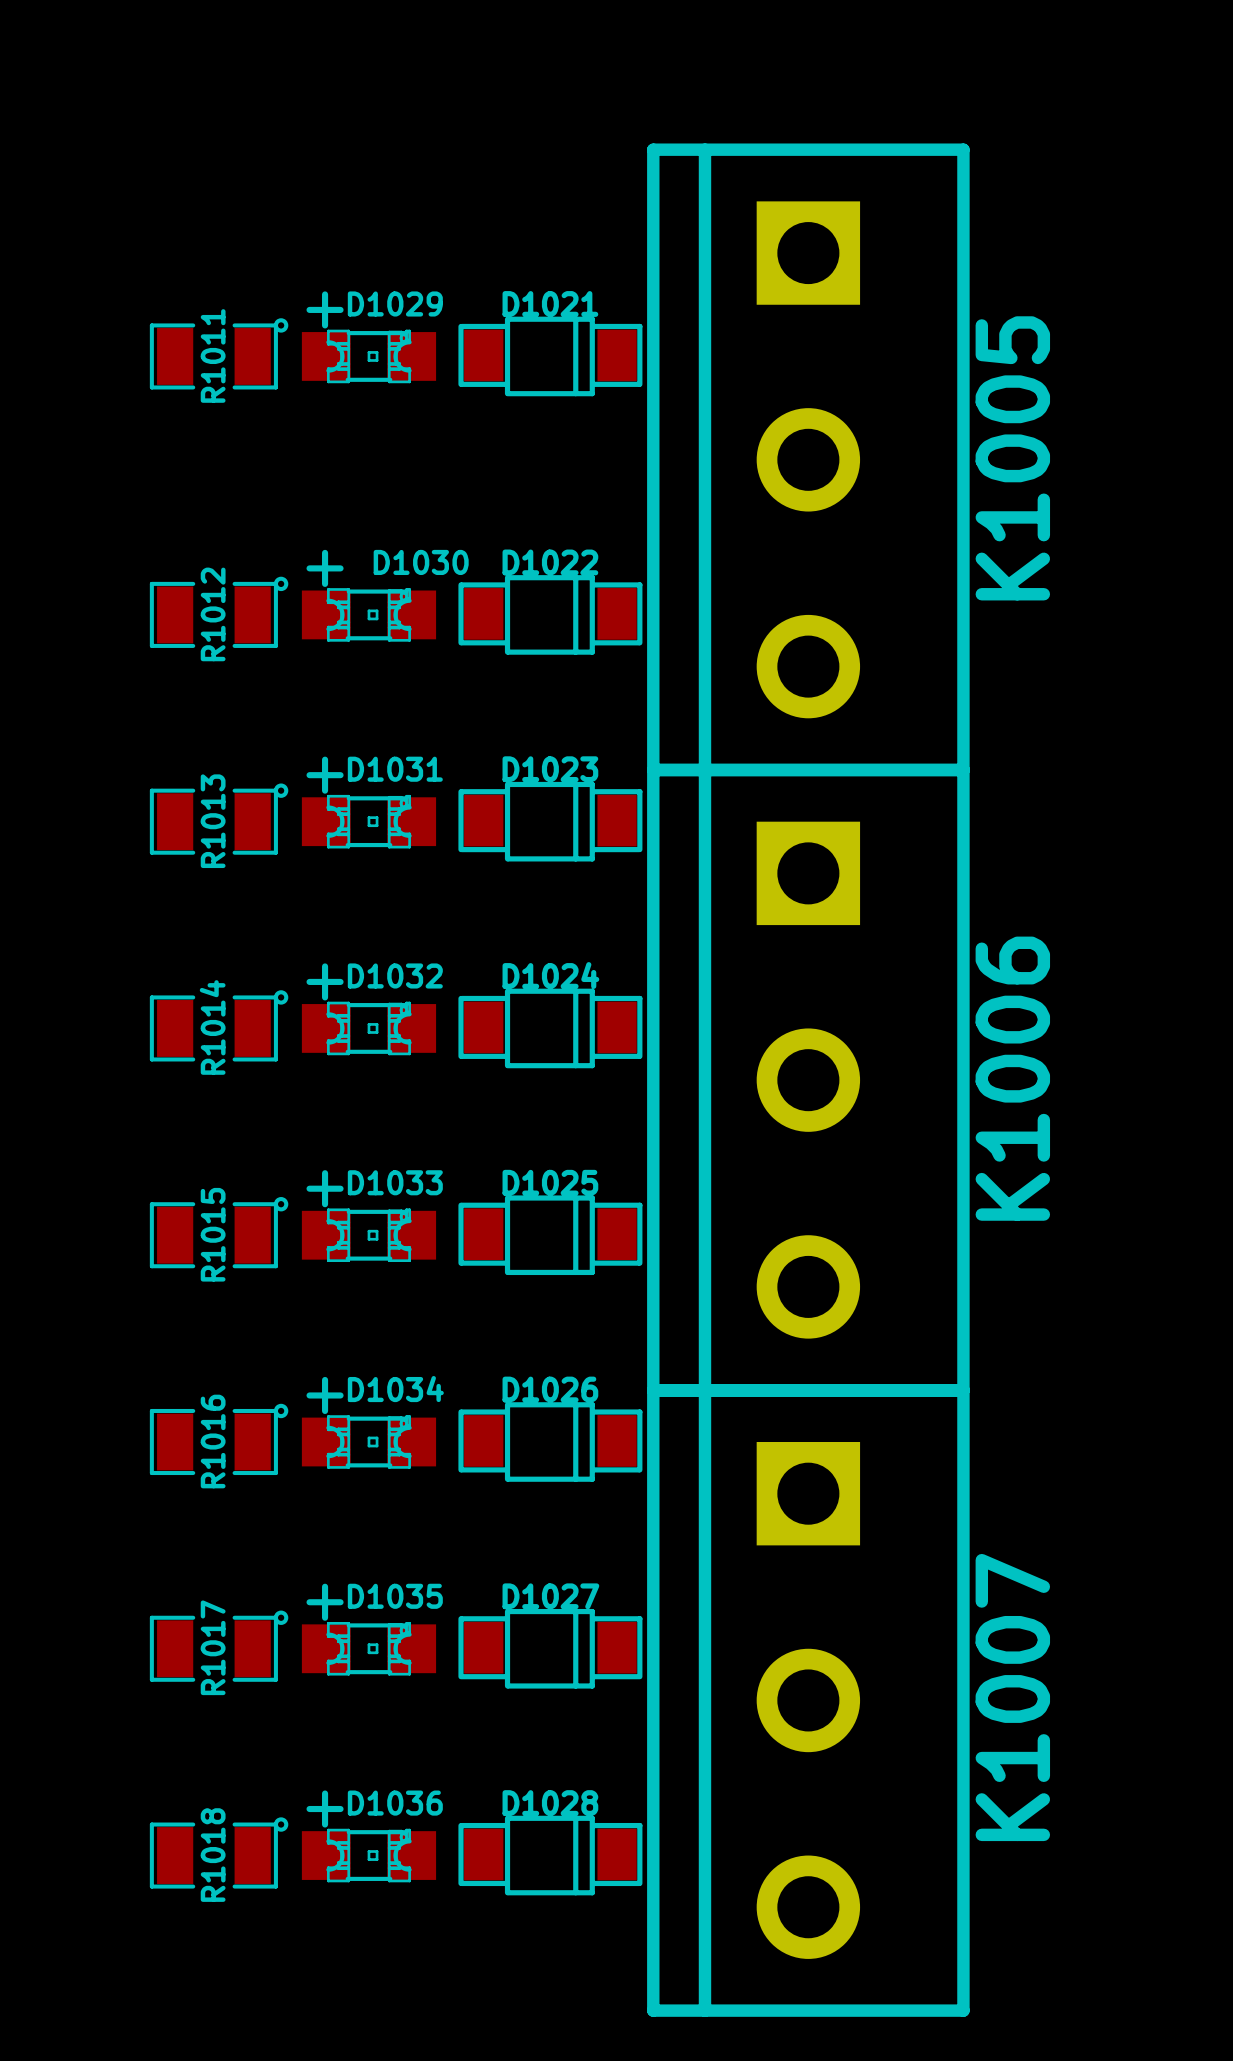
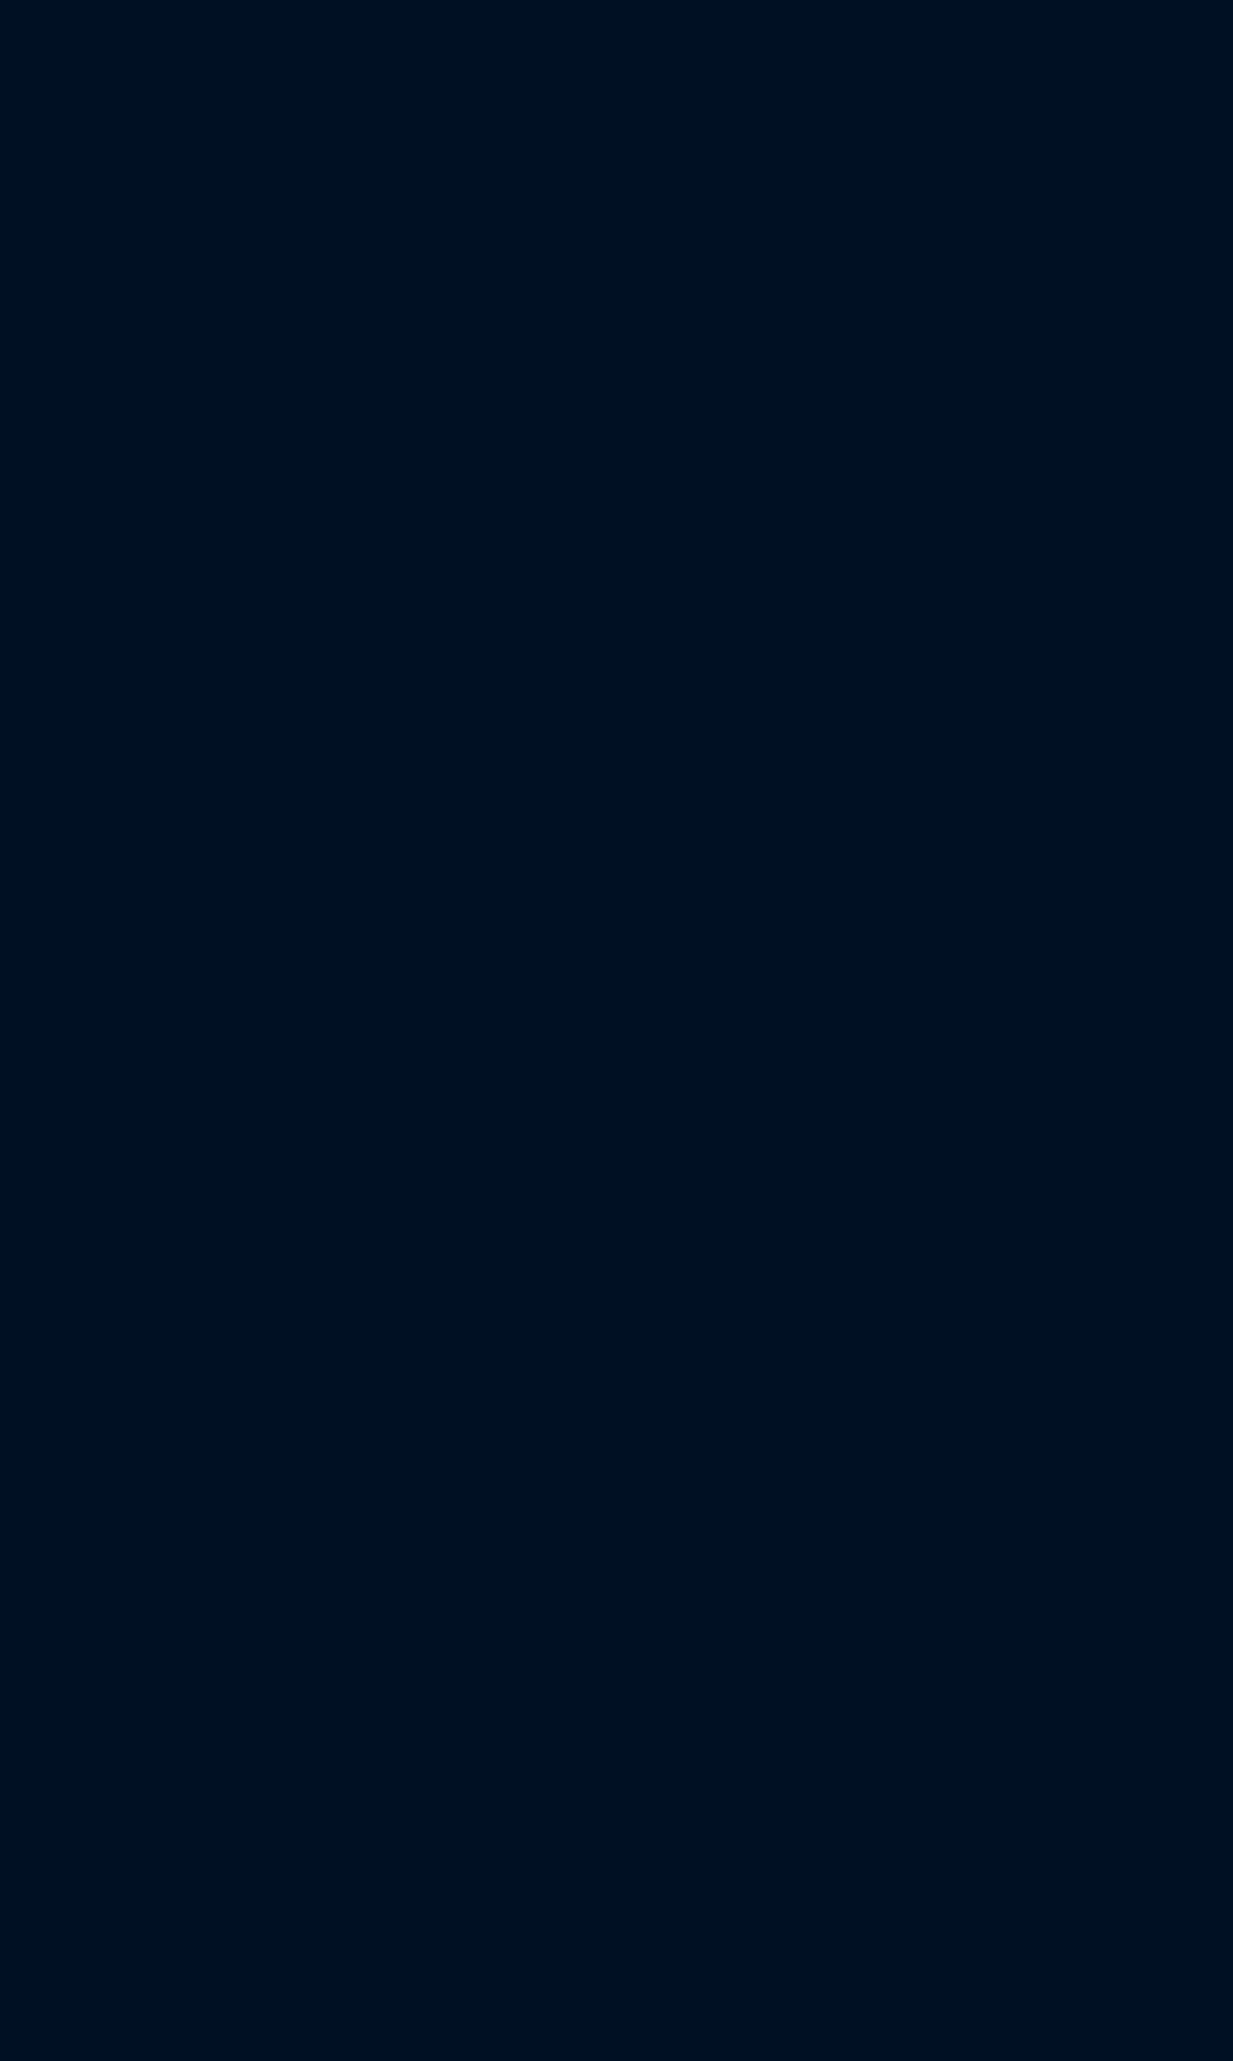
D1029: (368, 337) -> none
R1011: (219, 353) -> none
D1021: (550, 356) -> none
K1005: (808, 459) -> none
D1030: (368, 595) -> none
R1012: (219, 612) -> none
D1022: (550, 614) -> none
D1031: (368, 802) -> none
R1013: (219, 819) -> none
D1023: (550, 821) -> none
D1032: (368, 1009) -> none
R1014: (219, 1025) -> none
D1024: (550, 1028) -> none
K1006: (808, 1080) -> none
D1033: (368, 1216) -> none
R1015: (219, 1232) -> none
D1025: (550, 1235) -> none
D1034: (368, 1422) -> none
R1016: (219, 1439) -> none
D1026: (550, 1442) -> none
D1035: (368, 1629) -> none
R1017: (219, 1646) -> none
D1027: (550, 1648) -> none
K1007: (808, 1700) -> none
D1036: (368, 1836) -> none
R1018: (219, 1852) -> none
D1028: (550, 1855) -> none

